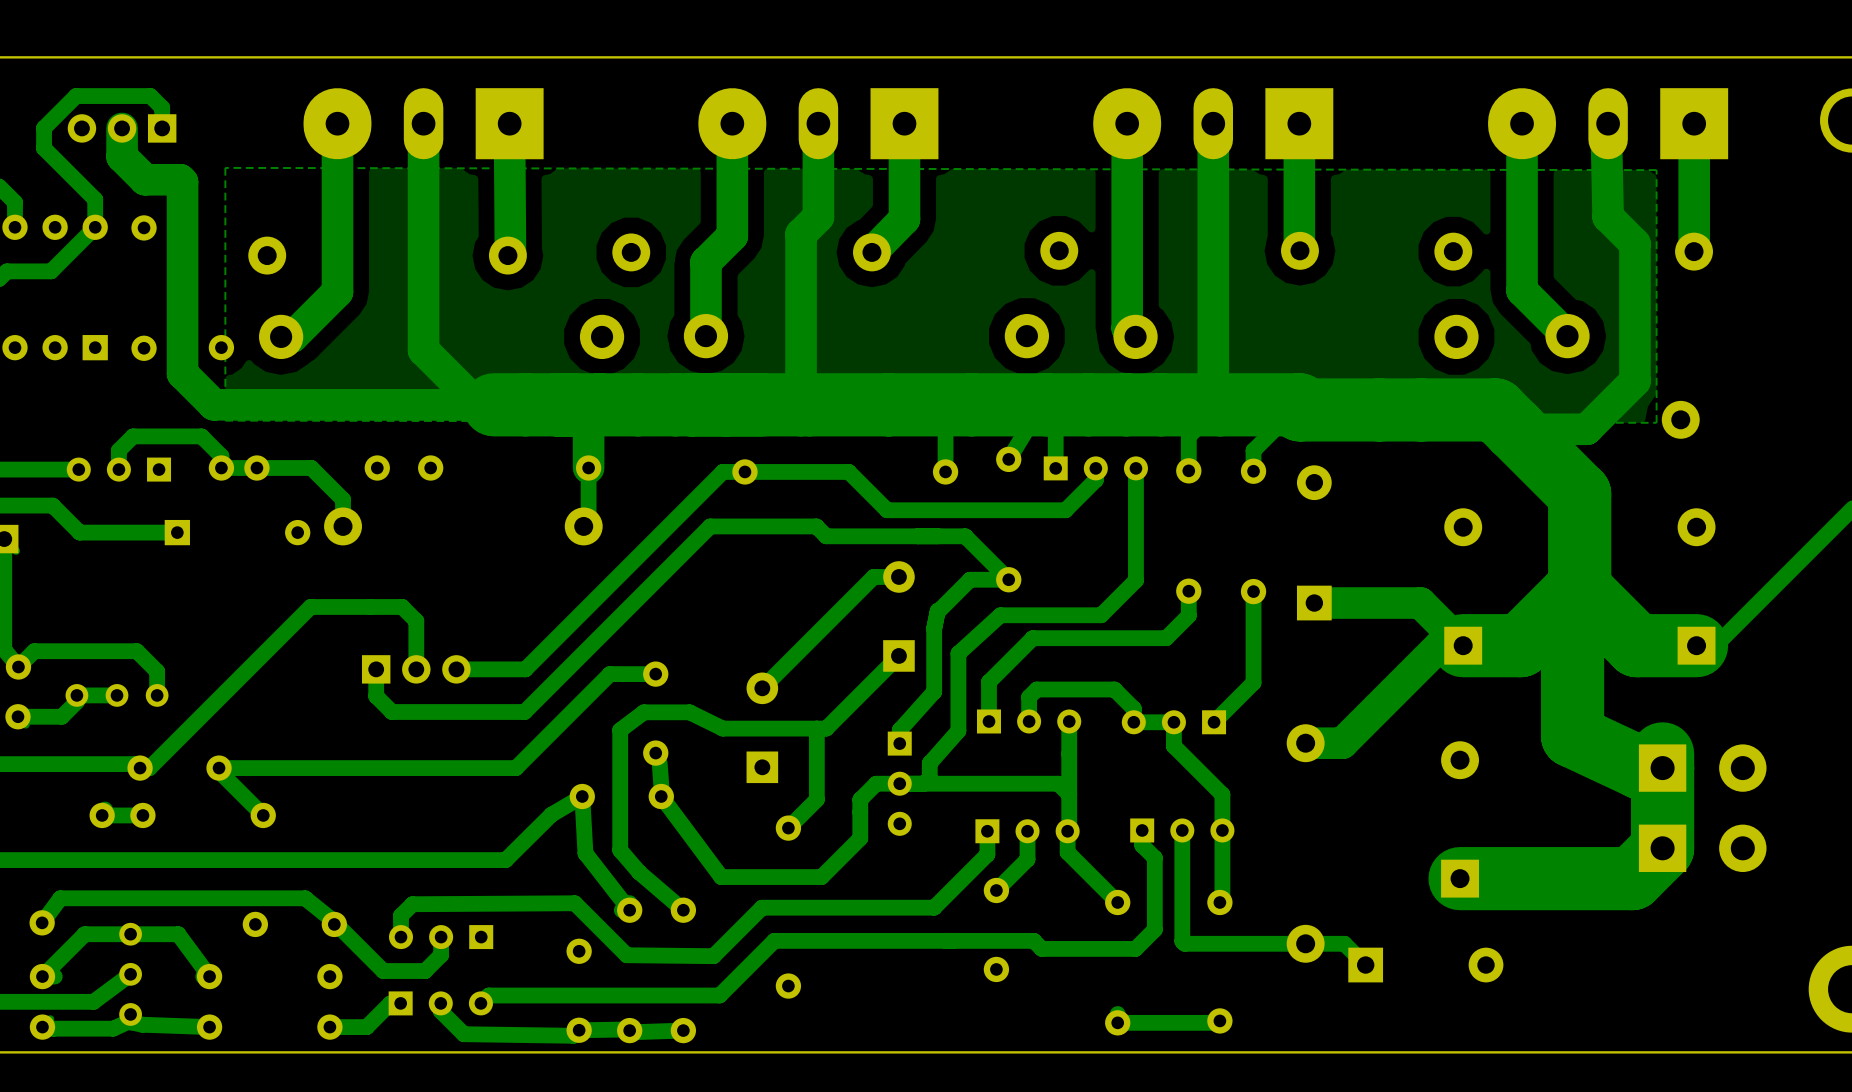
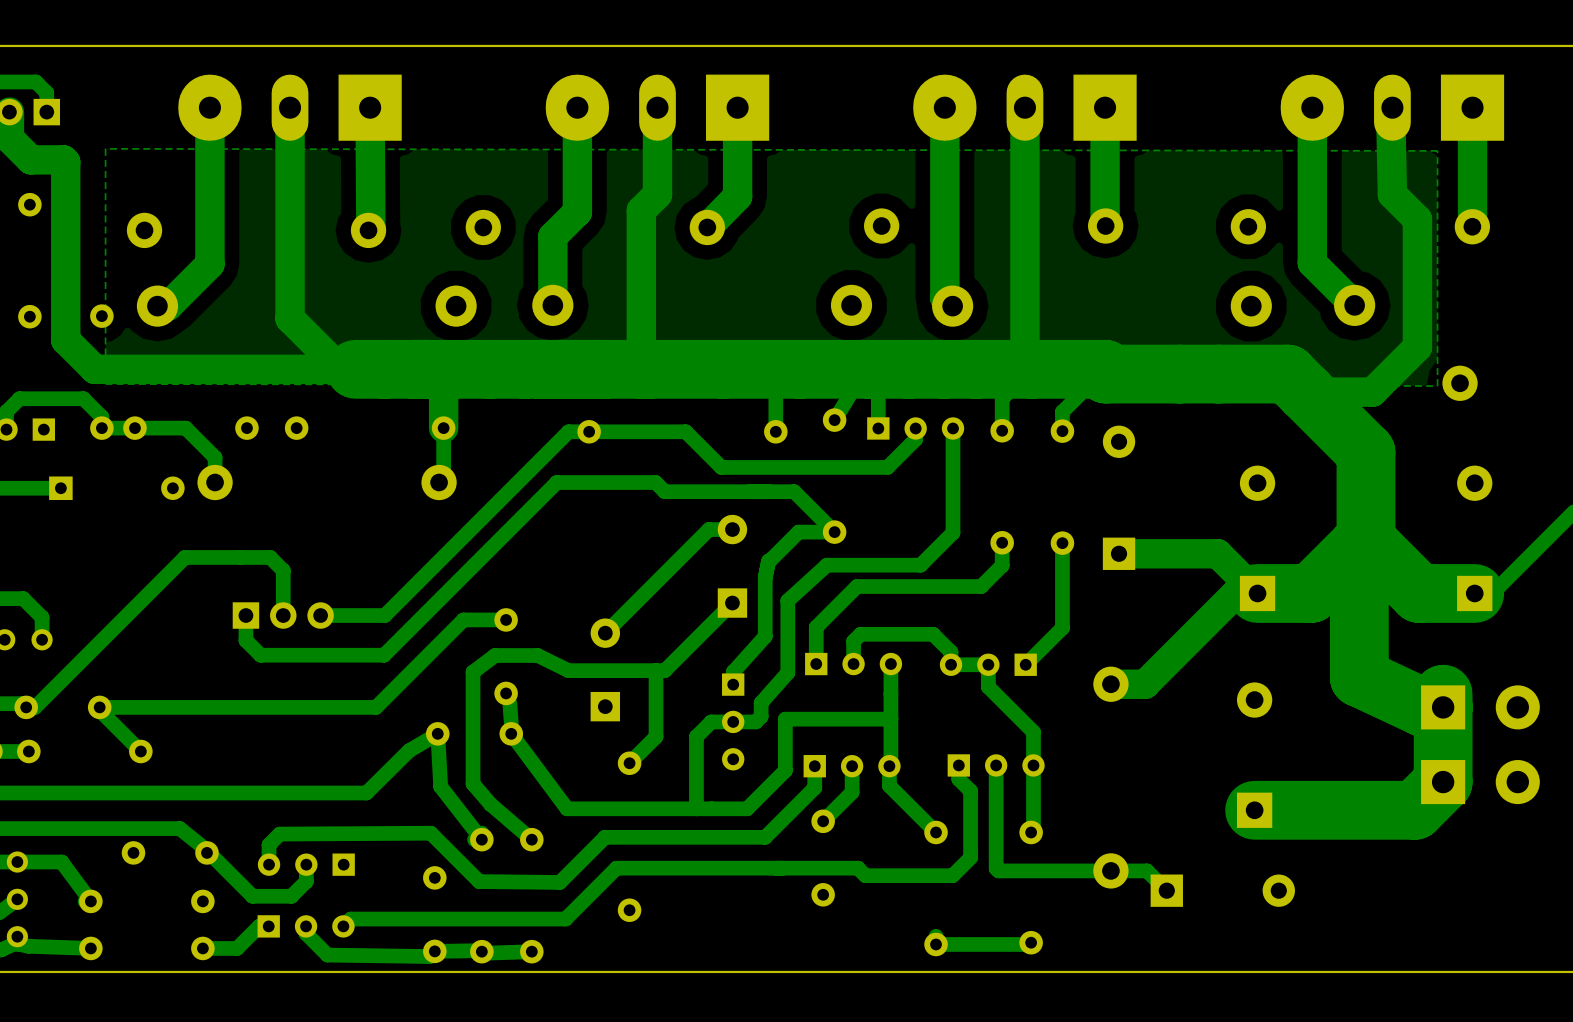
track: none -> (890, 719) (785, 719) (785, 770) (747, 808) (660, 808)
track: (924, 783) (1058, 783) (1069, 794) -> none
track: (860, 838) (821, 877) -> (696, 772) (696, 808)

